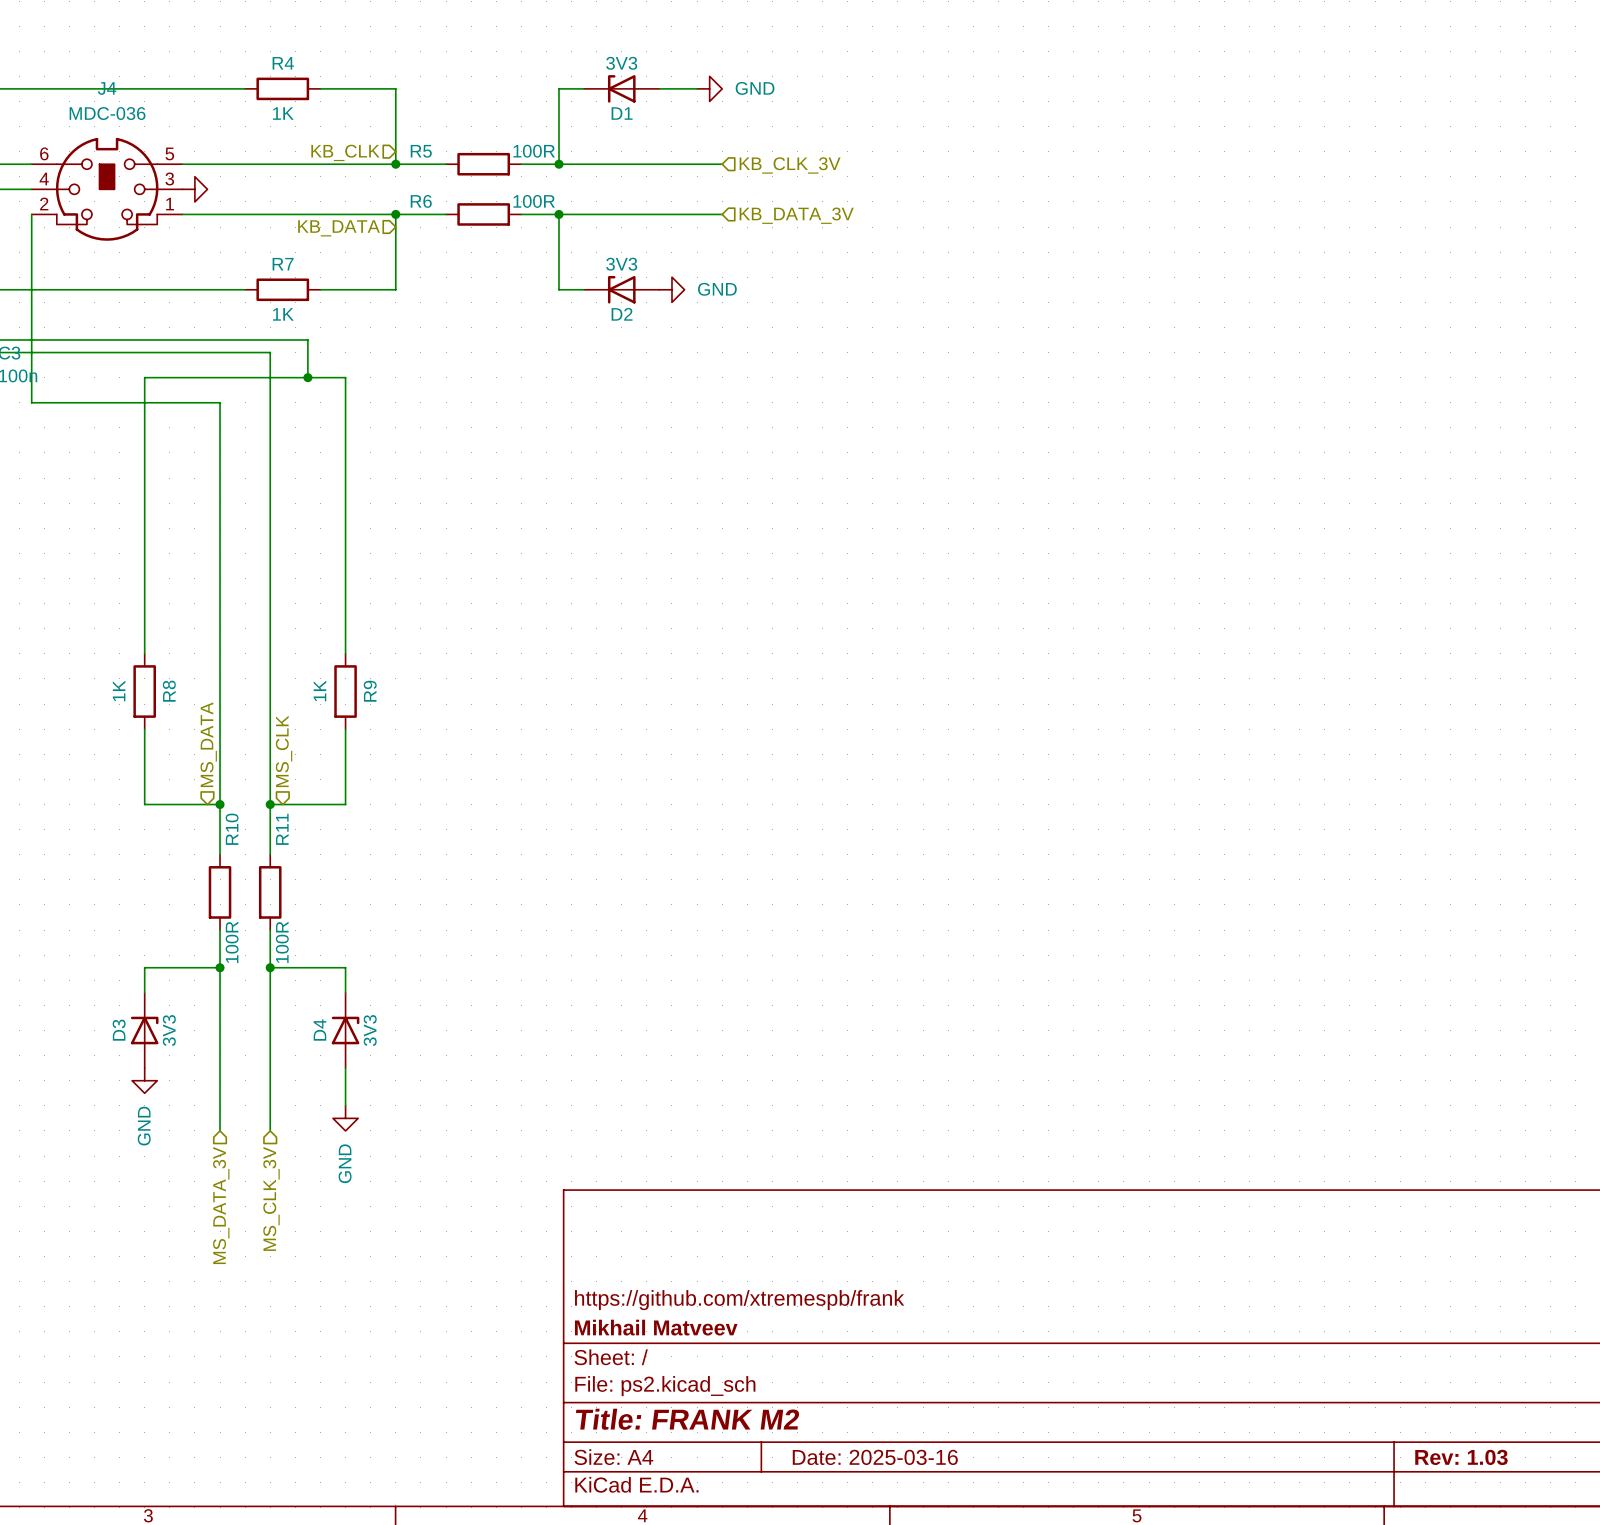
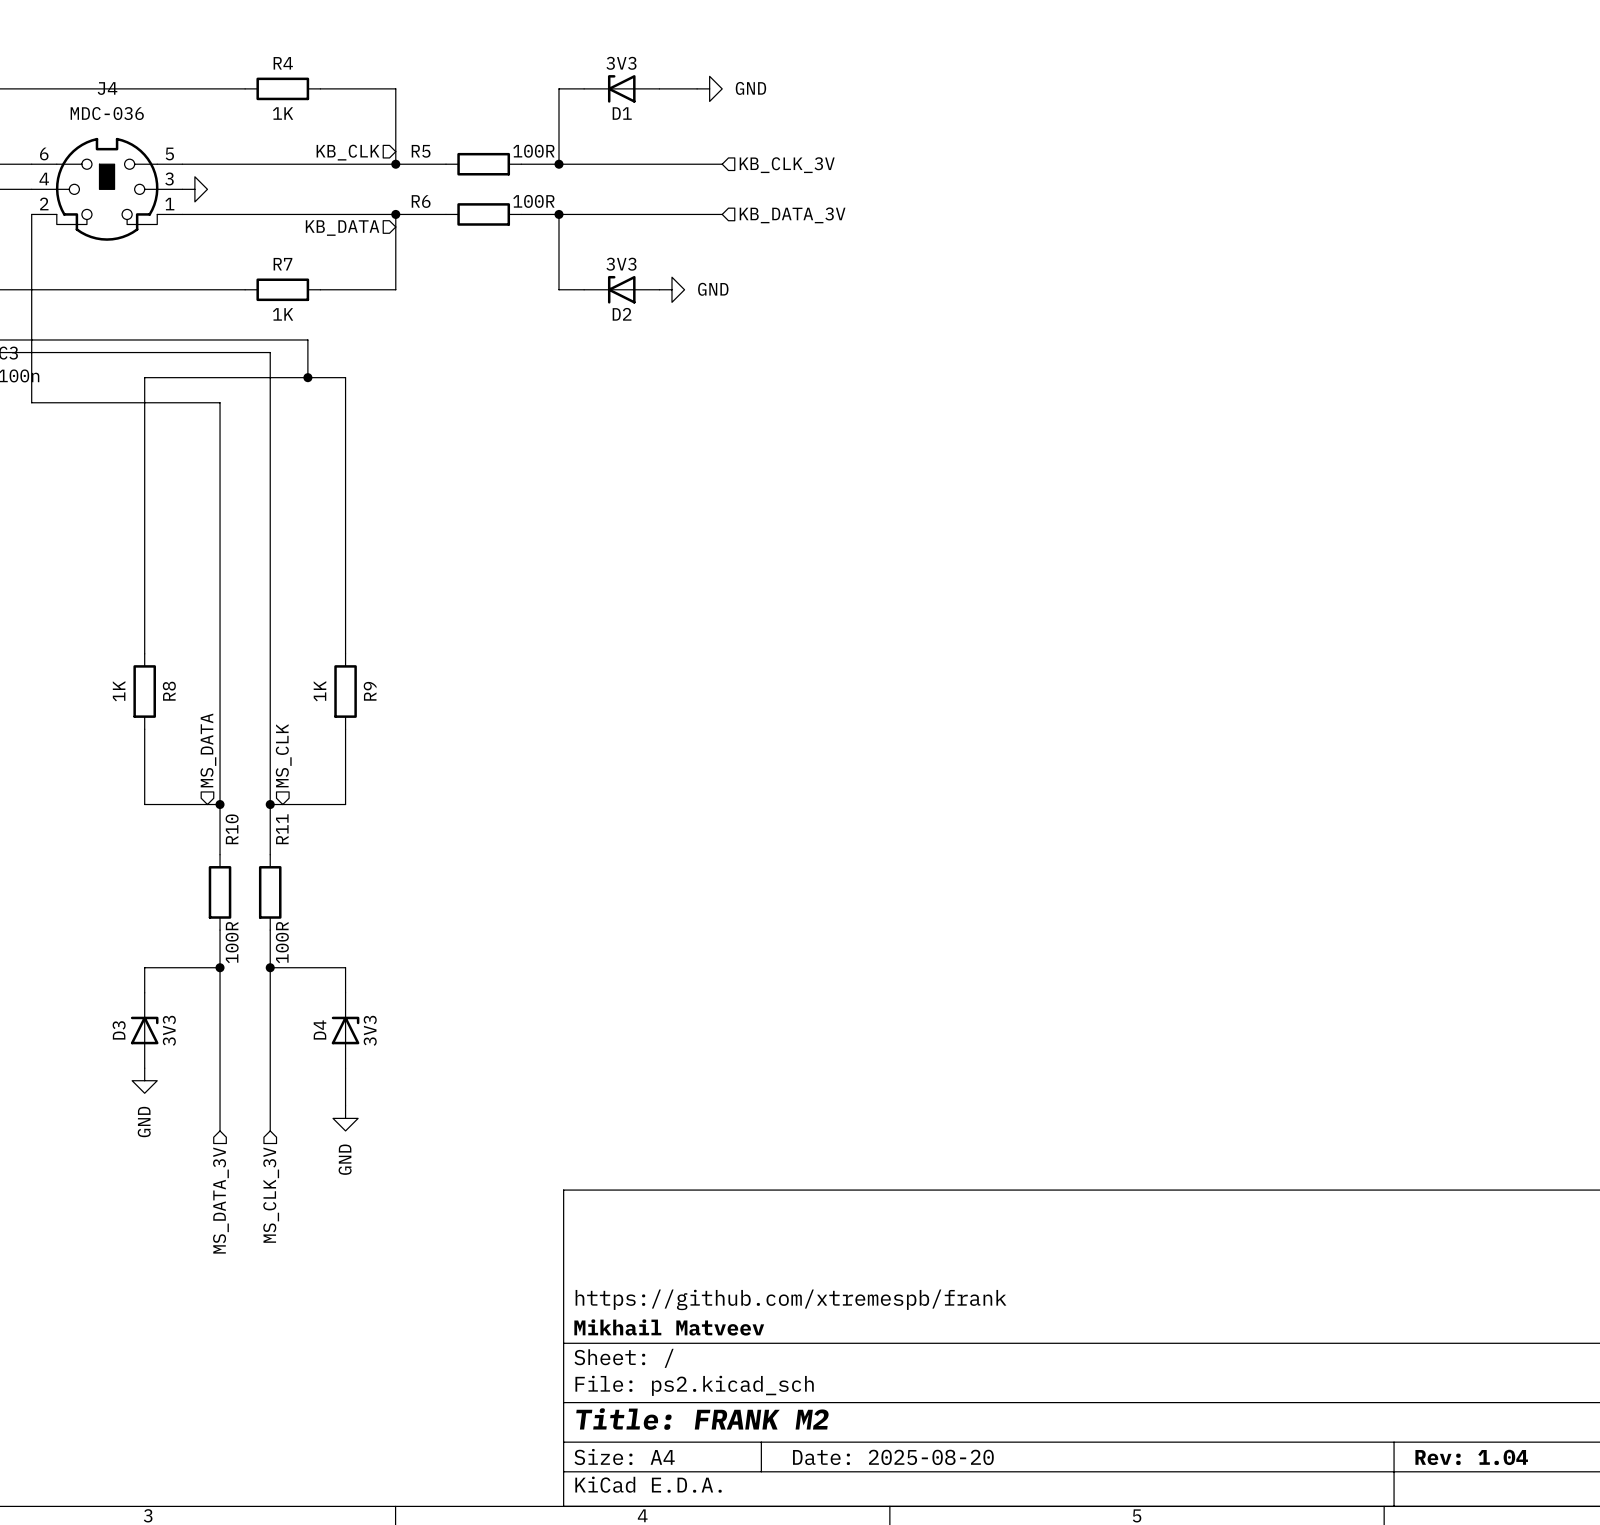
title block: Date: 2025-03-16 (875, 1457) -> Date: 2025-08-20 (893, 1457)
title block: Rev: 1.03 (1461, 1457) -> Rev: 1.04 (1471, 1457)

